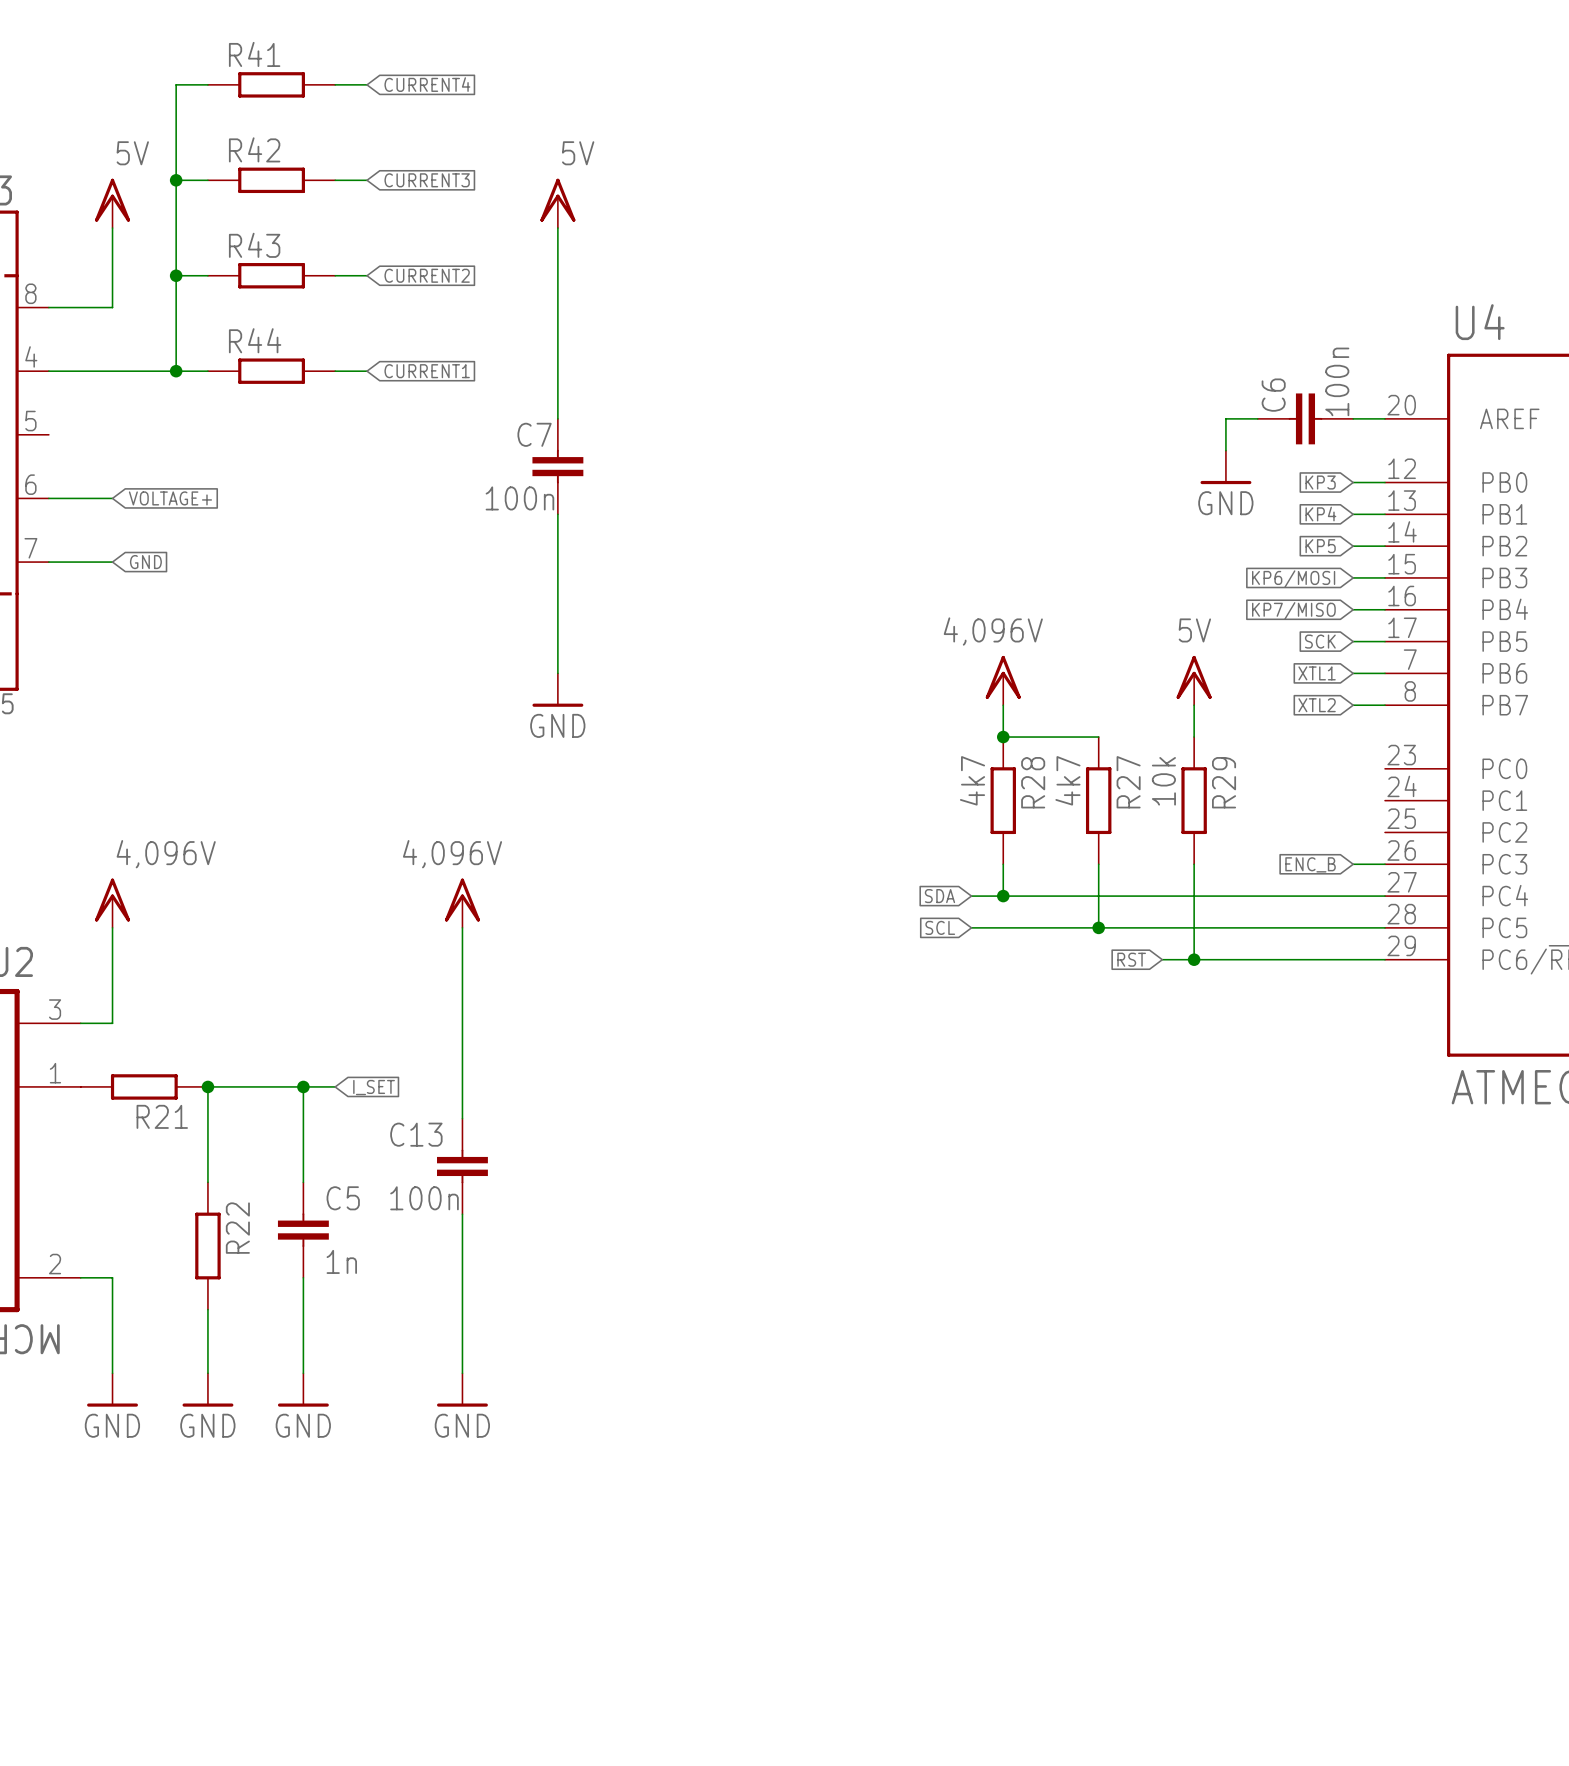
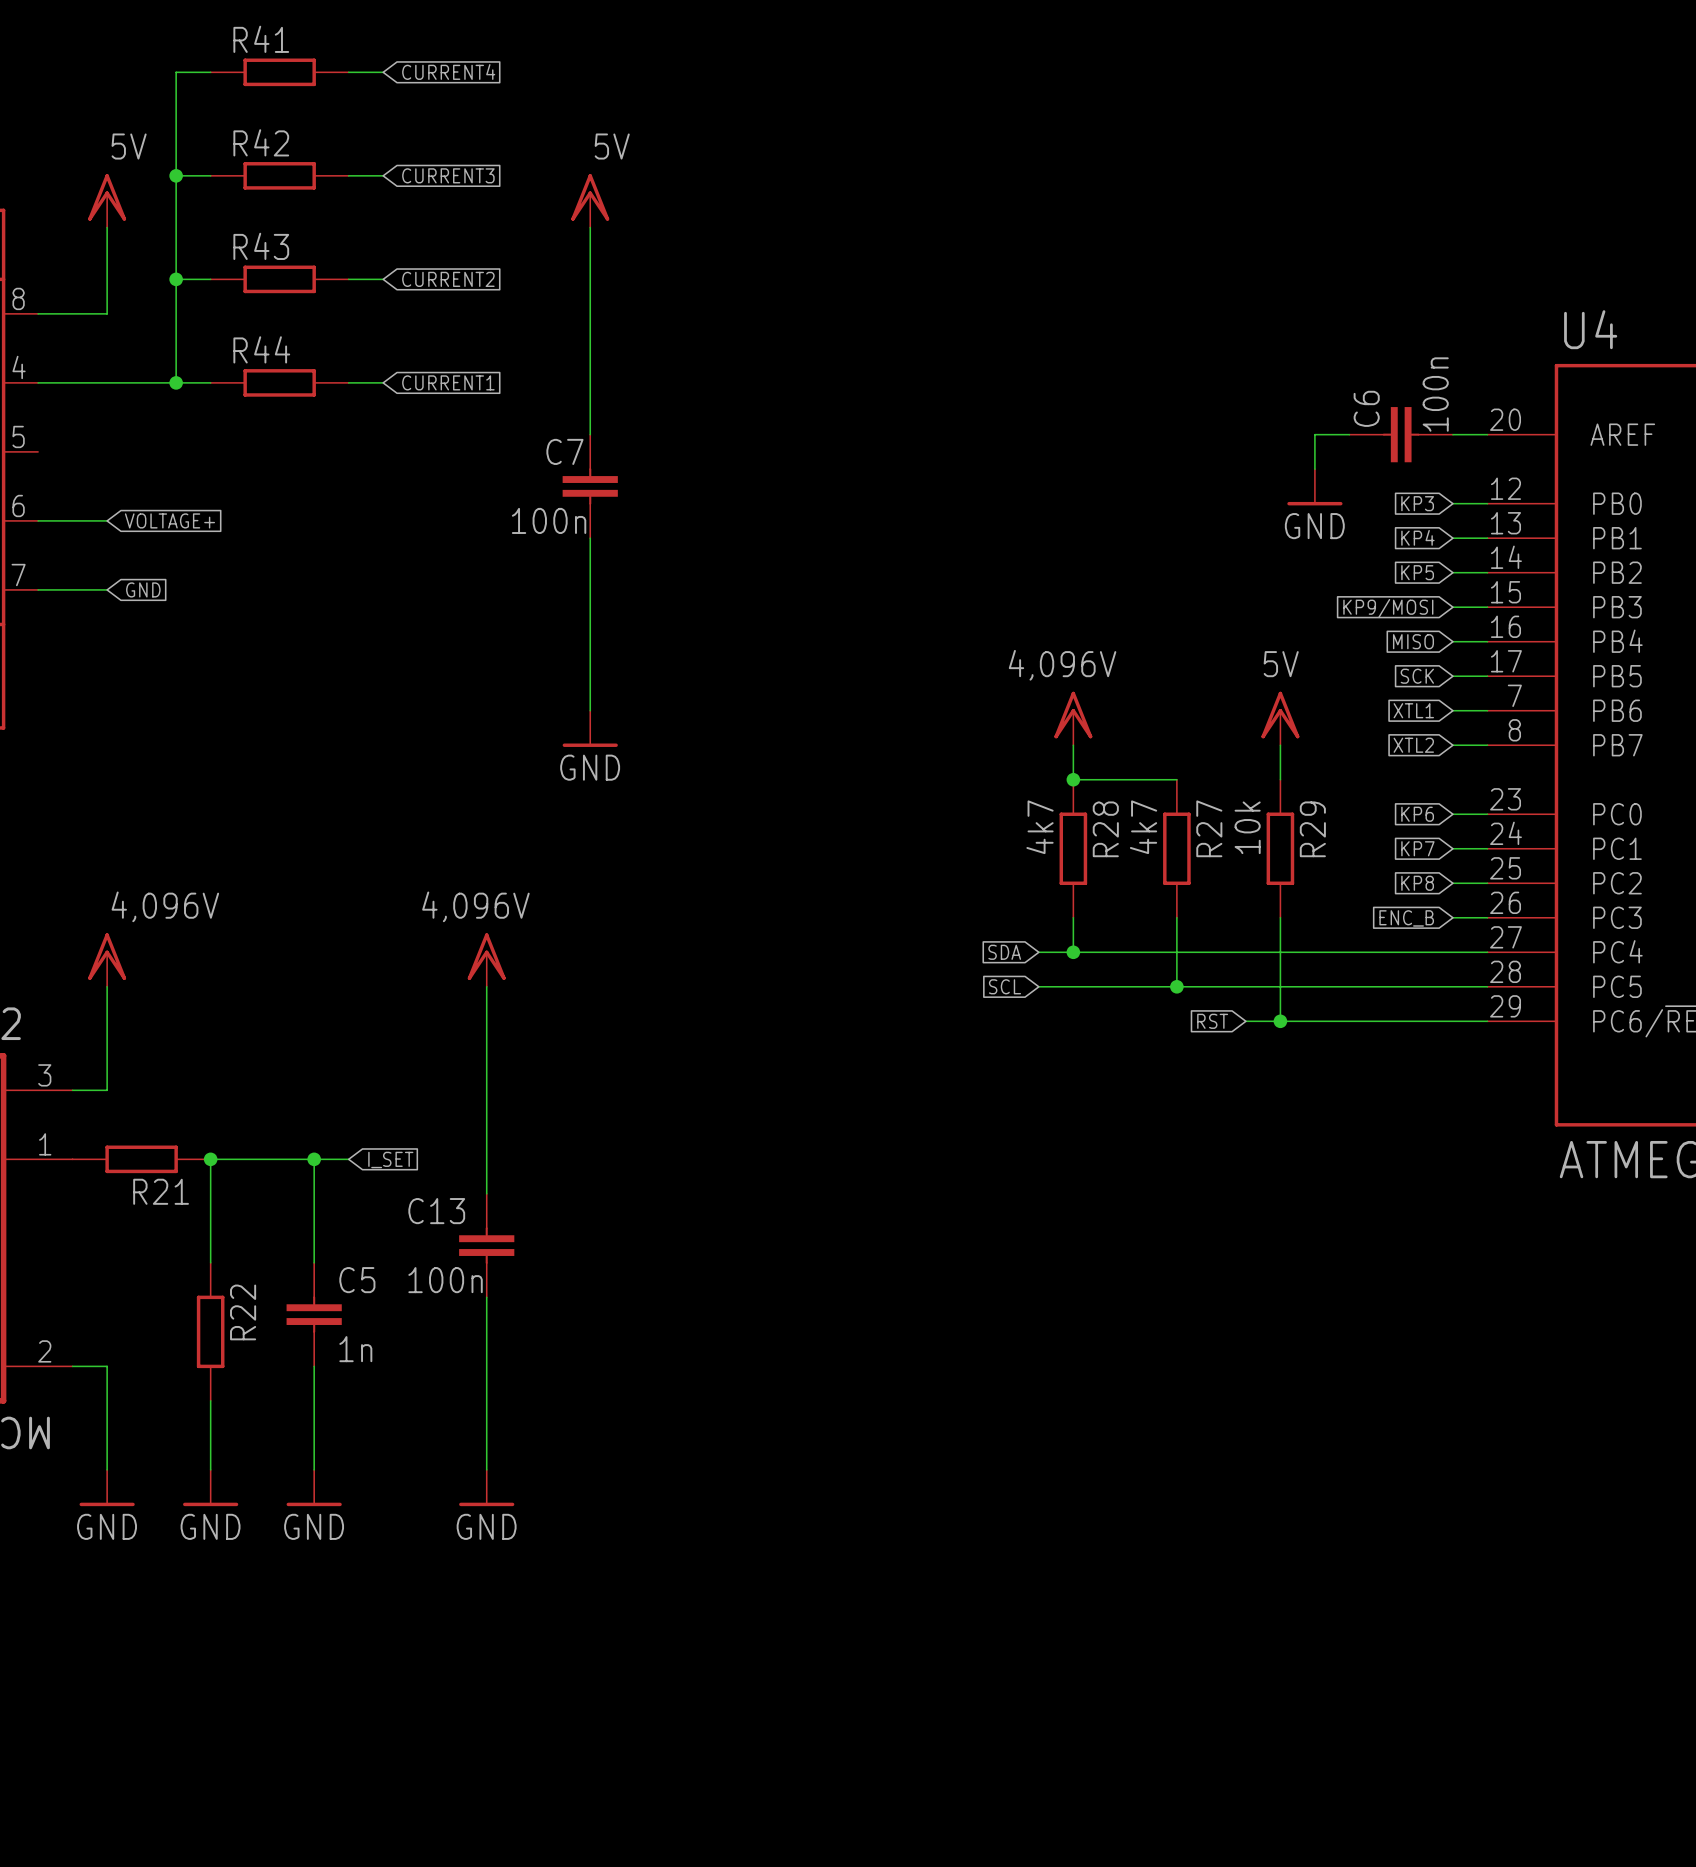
global label: KP6/MOSI (1293, 579) -> KP9/MOSI (1388, 608)
global label: KP7/MISO (1293, 610) -> MISO (1413, 641)
global label: none -> KP6 (1417, 814)
wire: none -> (1452, 814) (1487, 814)
global label: none -> KP7 (1417, 848)
wire: none -> (1452, 848) (1487, 848)
global label: none -> KP8 (1417, 883)
wire: none -> (1452, 883) (1487, 883)

